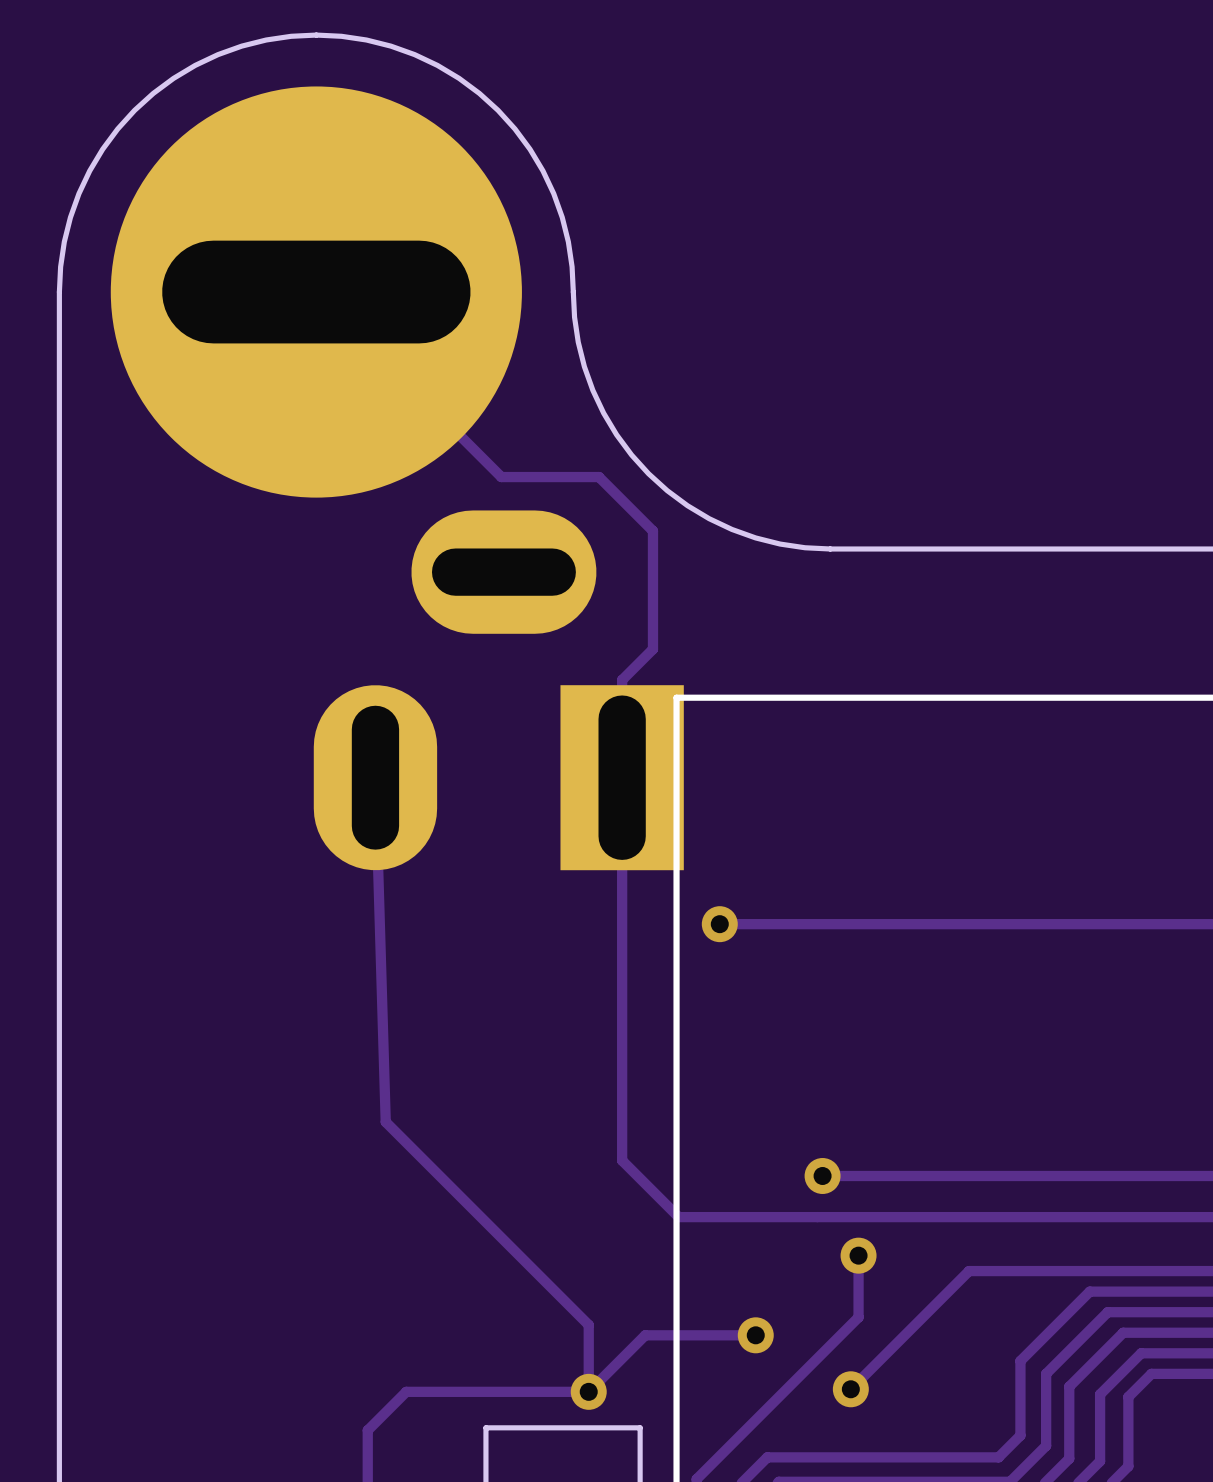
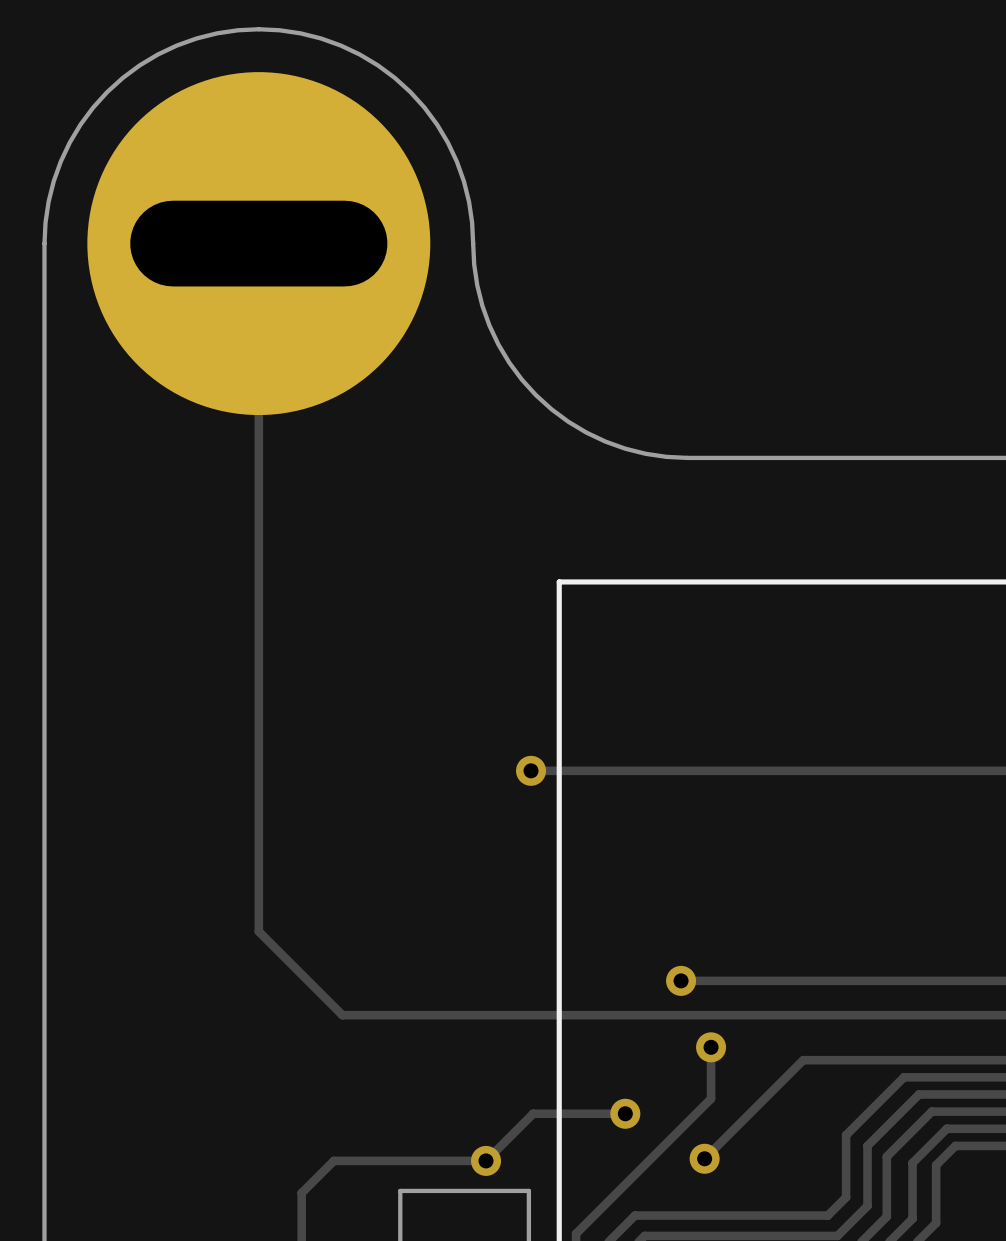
track: (316, 292) (501, 477) (599, 477) (652, 531) (652, 649) (622, 680) (622, 1160) (678, 1217) -> (258, 243) (258, 931) (342, 1015) (561, 1015)
part: (498, 690) -> none
track: (375, 777) (385, 1122) (588, 1325) (588, 1391) -> none
track: none -> (531, 770) (595, 770)
via position: (719, 924) -> (531, 770)

